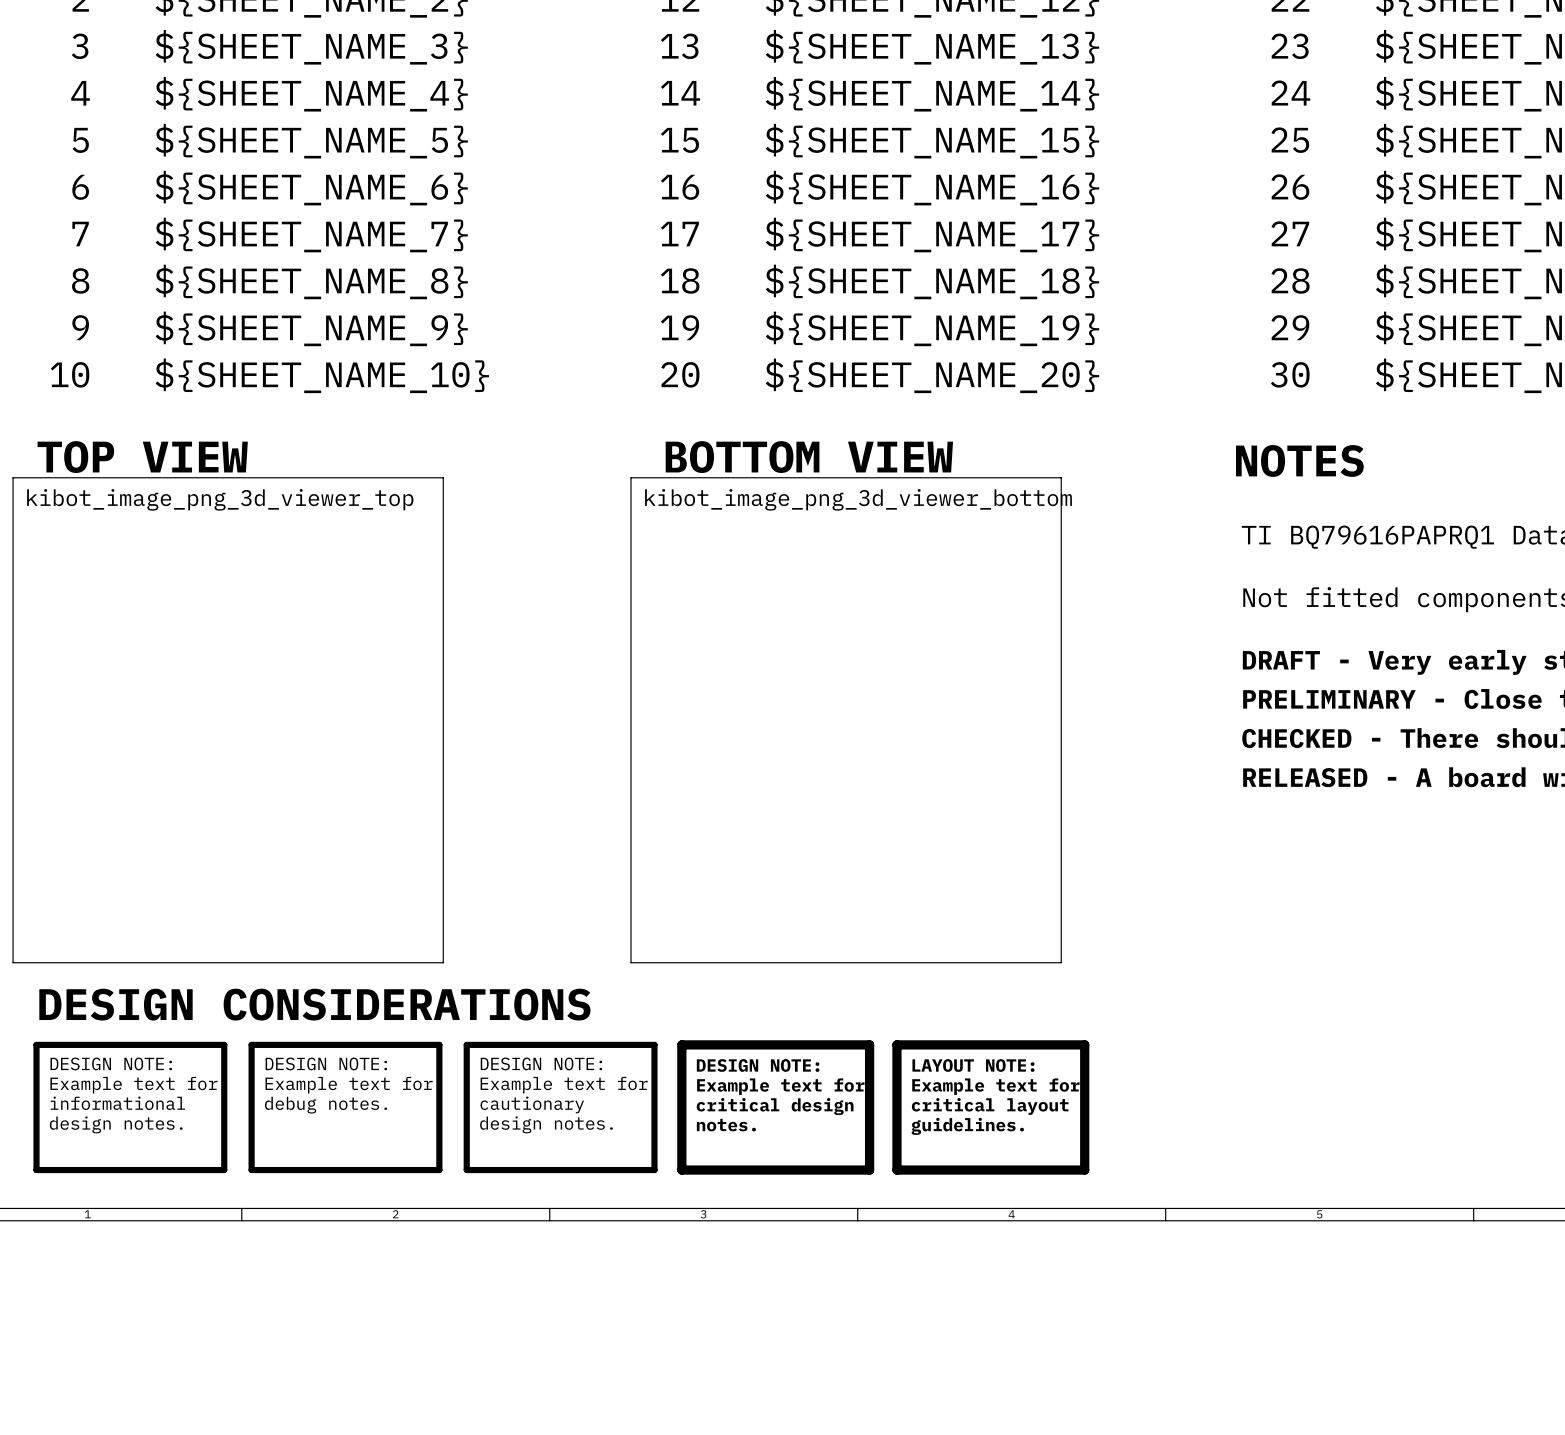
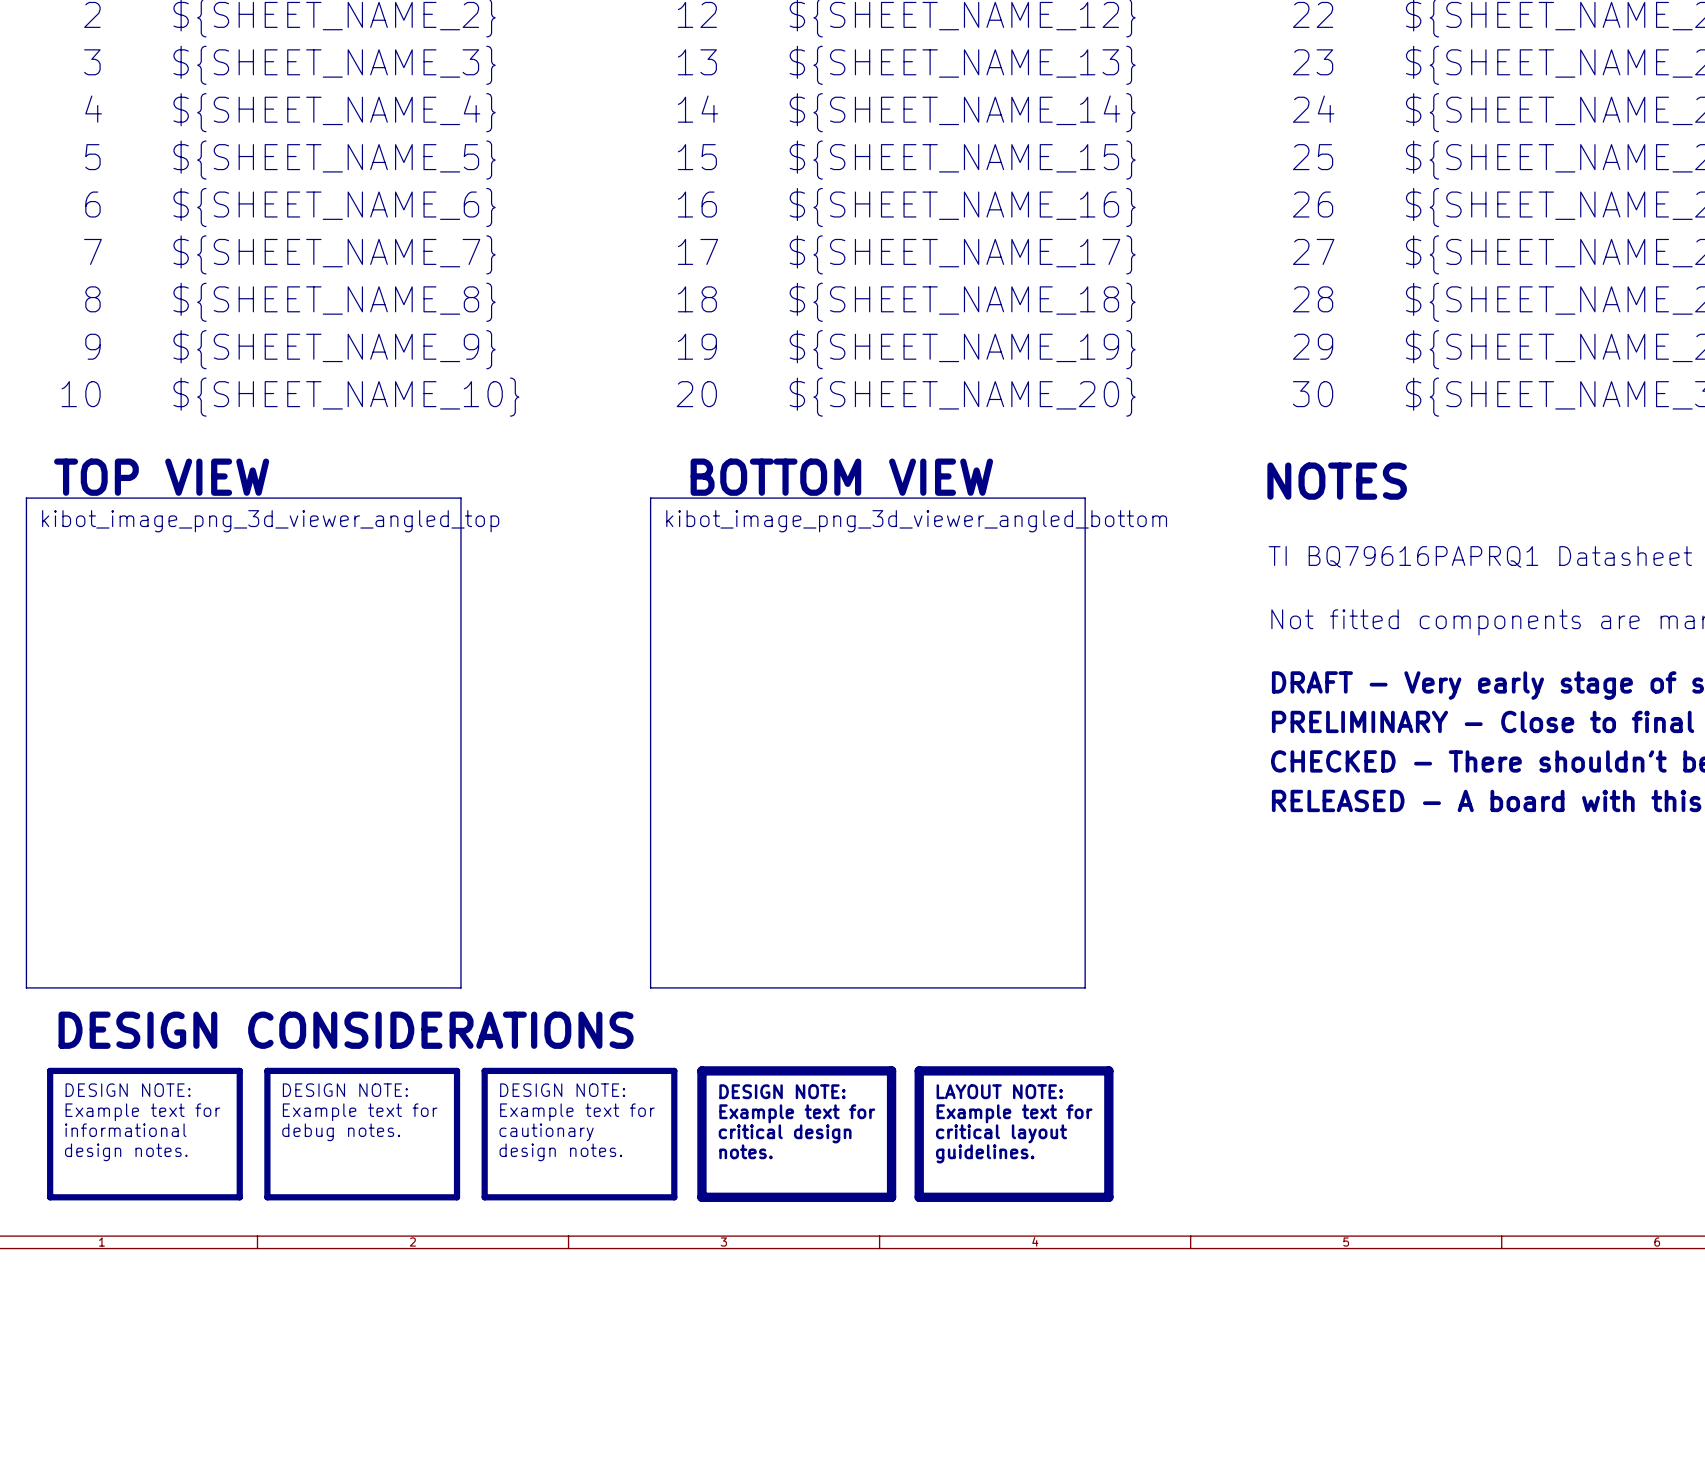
text: kibot_image_png_3d_viewer_top (220, 499) -> kibot_image_png_3d_viewer_angled_top (270, 521)
text: kibot_image_png_3d_viewer_bottom (858, 499) -> kibot_image_png_3d_viewer_angled_bottom (916, 521)

